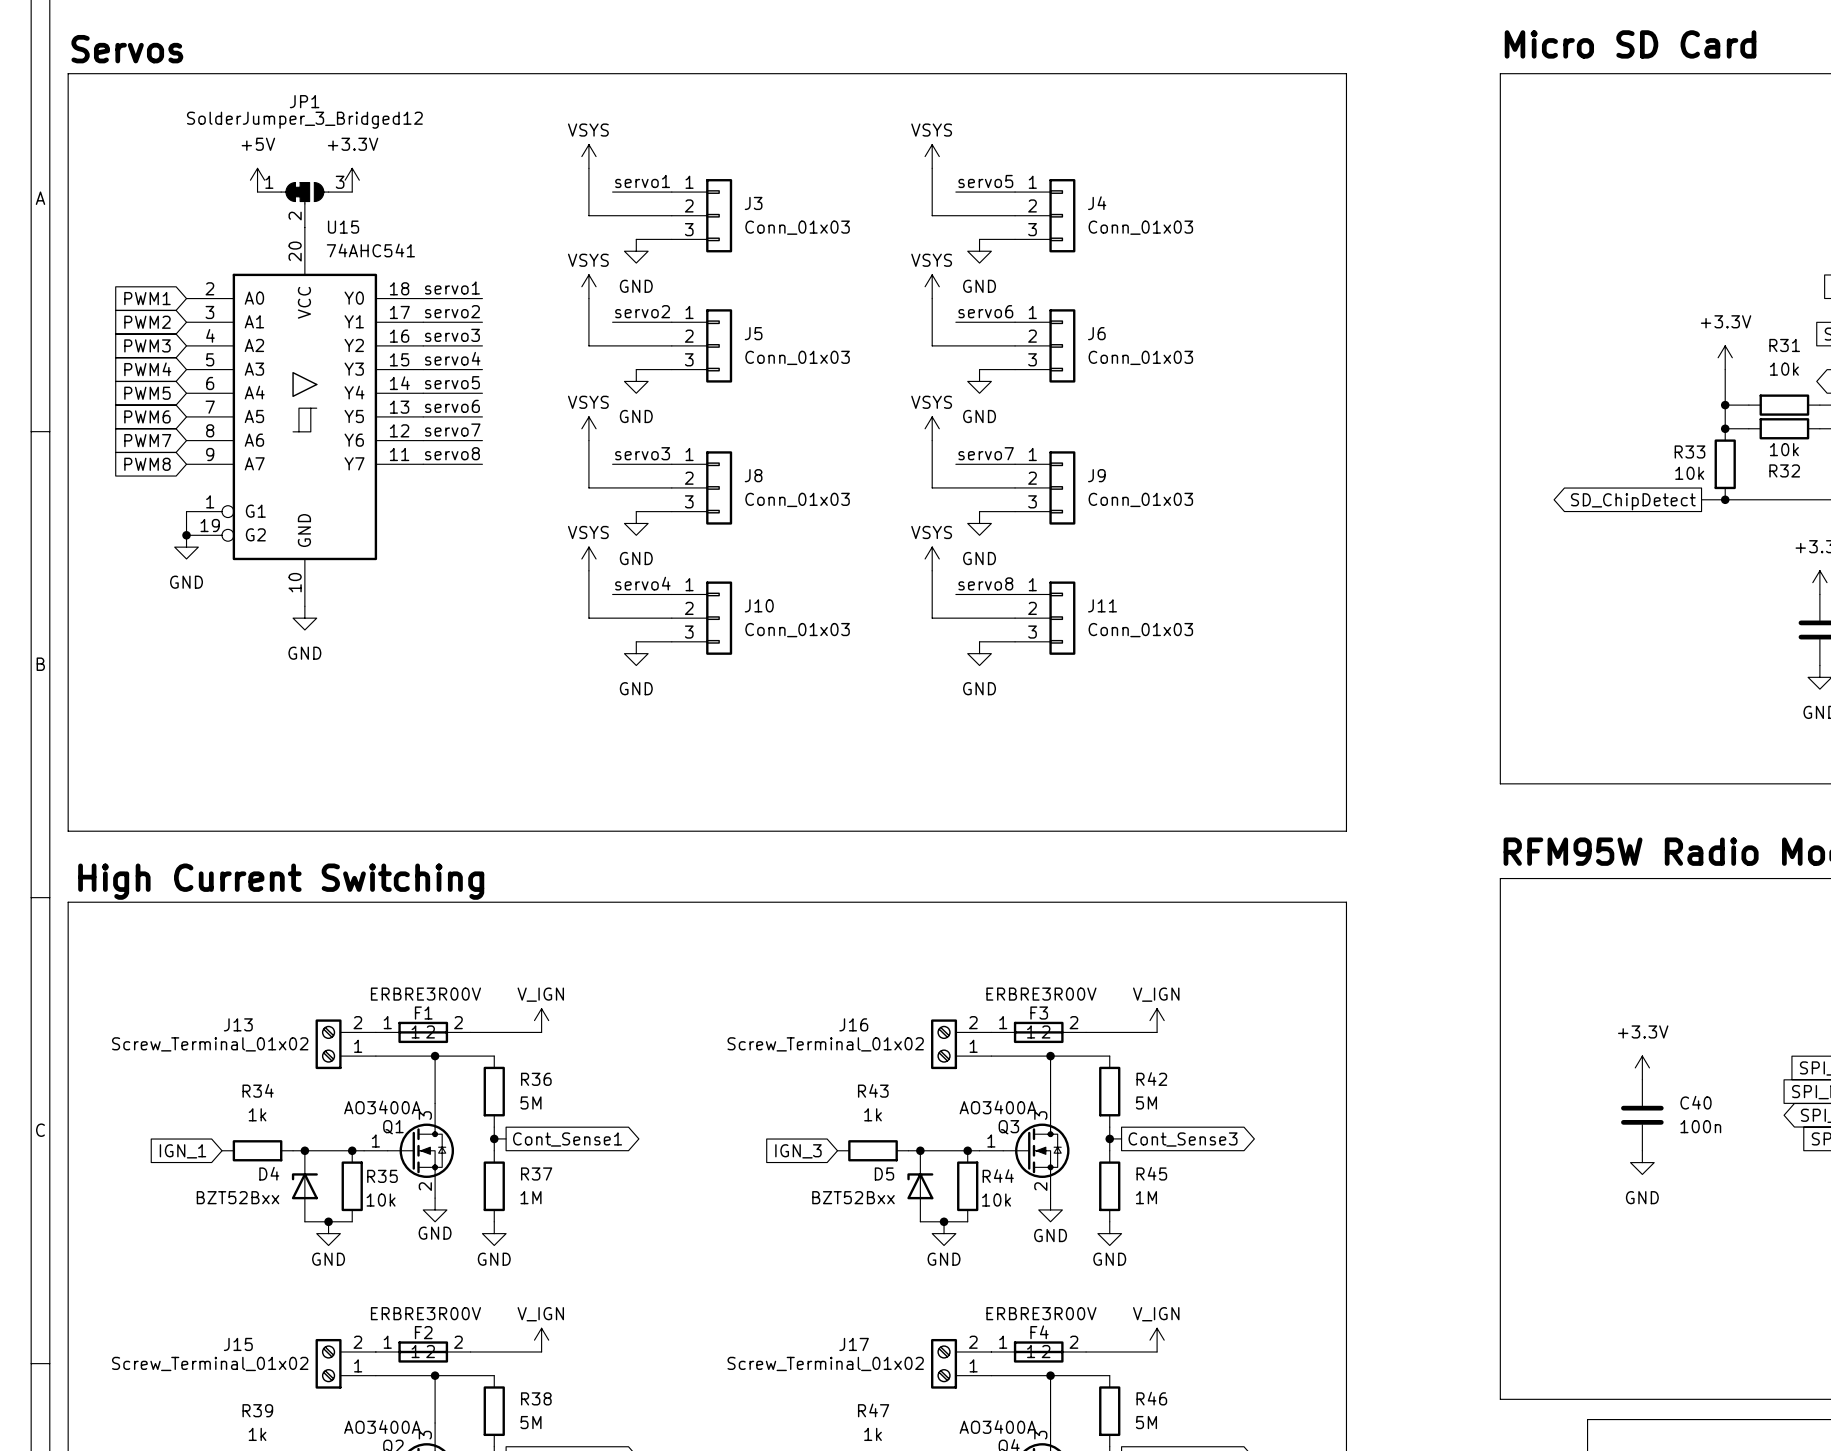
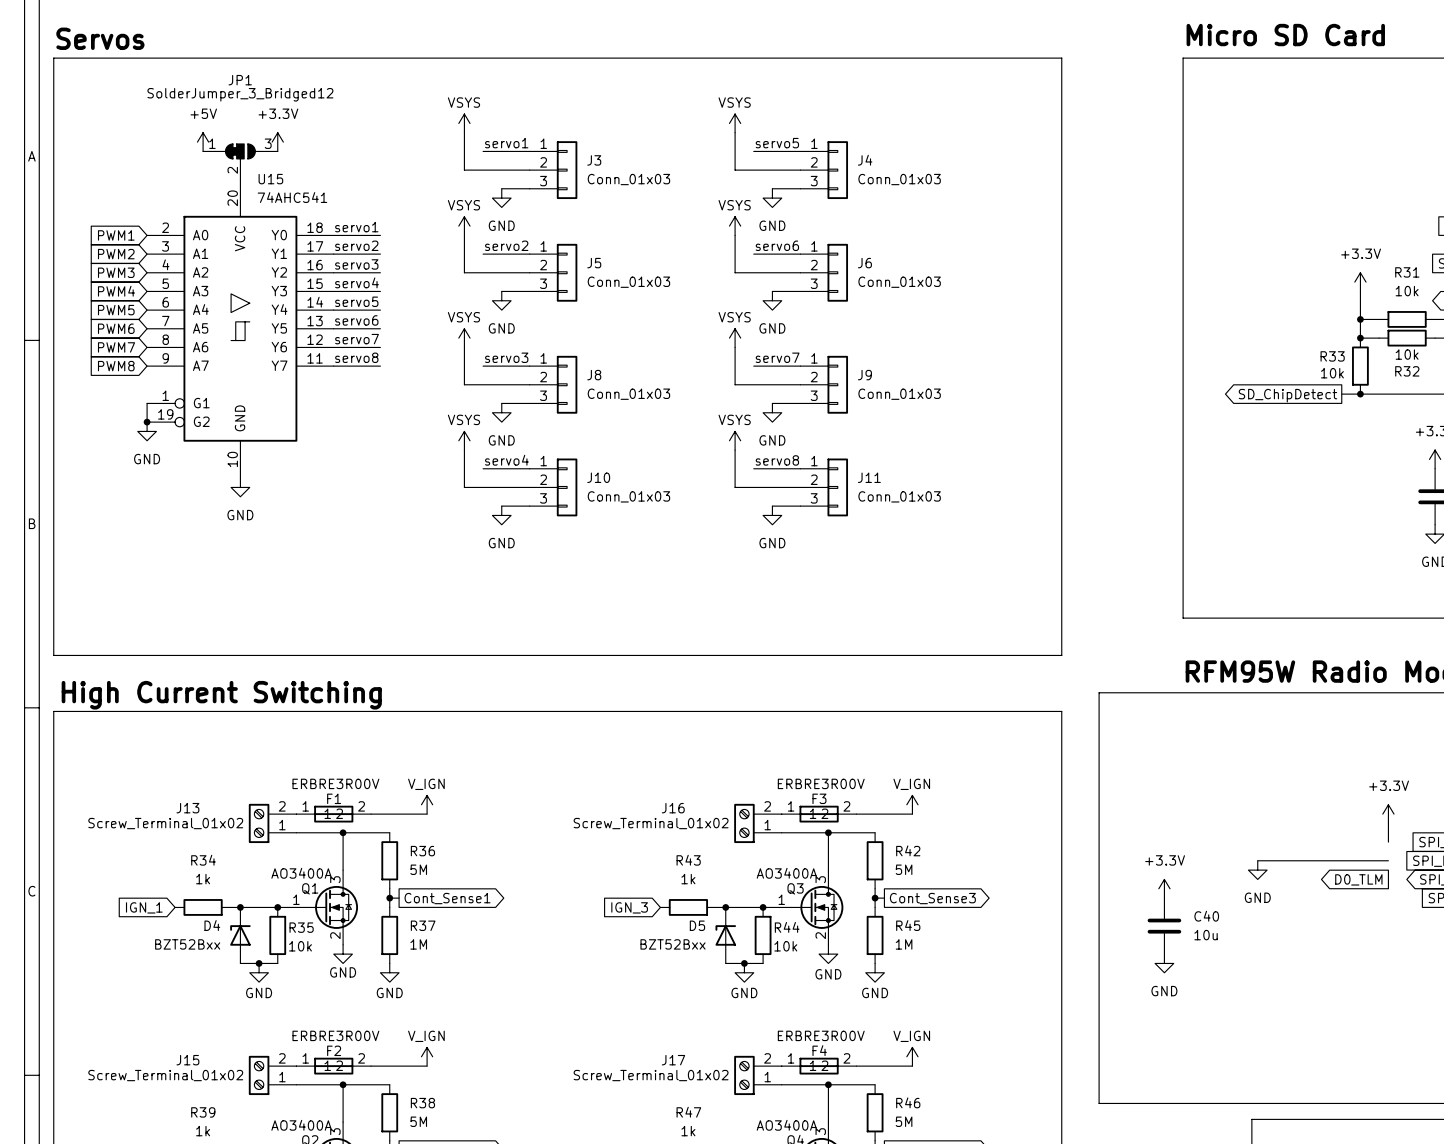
line: (1500, 878) (1500, 1399) -> (1183, 692) (1099, 692) (1099, 1103) (1183, 1103)
power symbol: none -> +3.3V (1388, 814)
wire: none -> (1388, 823) (1388, 842)
power symbol: +3.3V (1642, 1067) -> none
wire: none -> (1257, 860) (1388, 860)
C40 position: (1642, 1115) -> (1164, 926)
global label: none -> D0_TLM (1358, 879)
C40 value: 100n (1700, 1126) -> 10u (1206, 935)
power symbol: none -> +3.3V (1164, 888)
power symbol position: GND (1642, 1162) -> GND (1257, 870)
power symbol: none -> GND (1164, 963)

